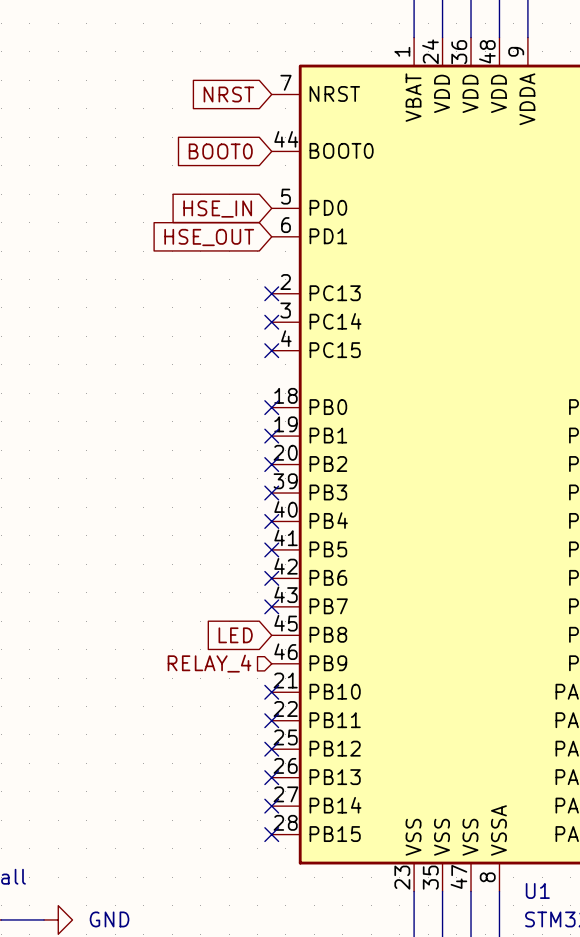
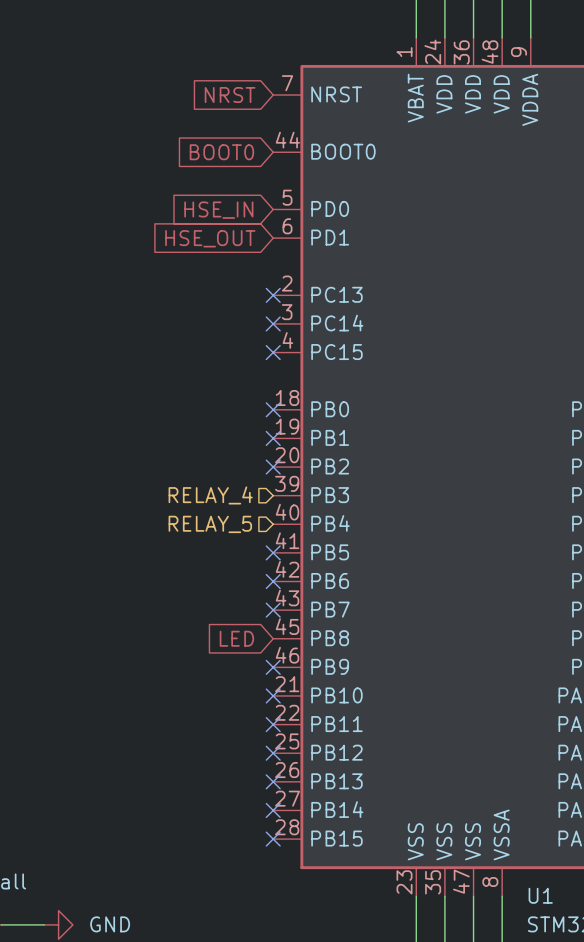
no-connect mark: (271, 493) -> none
hierarchical label: none -> RELAY_5 (210, 524)
no-connect mark: (271, 521) -> none
hierarchical label position: RELAY_4 (209, 663) -> RELAY_4 (210, 495)
no-connect mark: none -> (273, 667)

